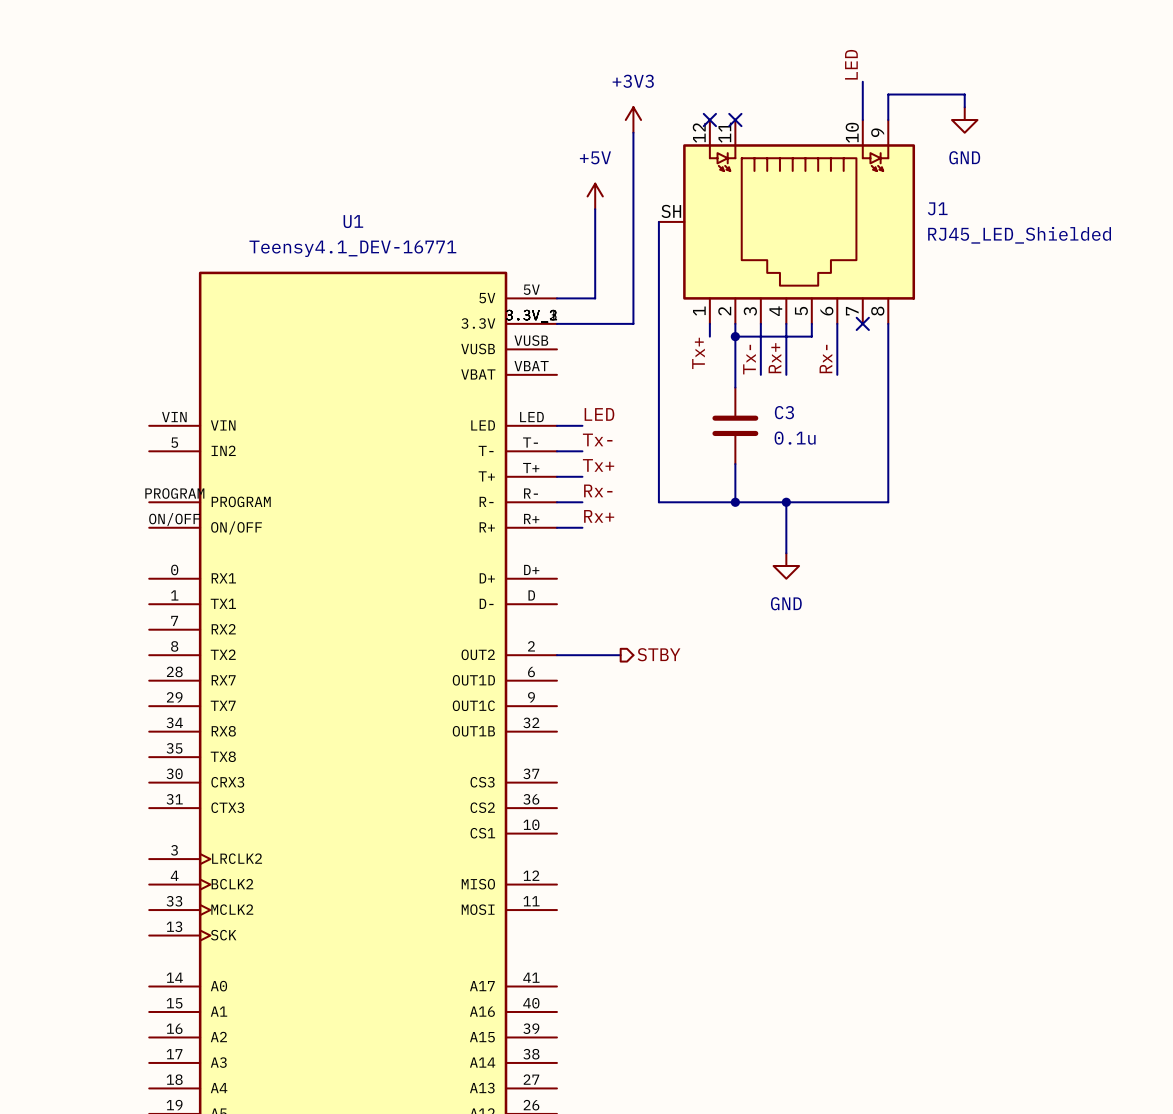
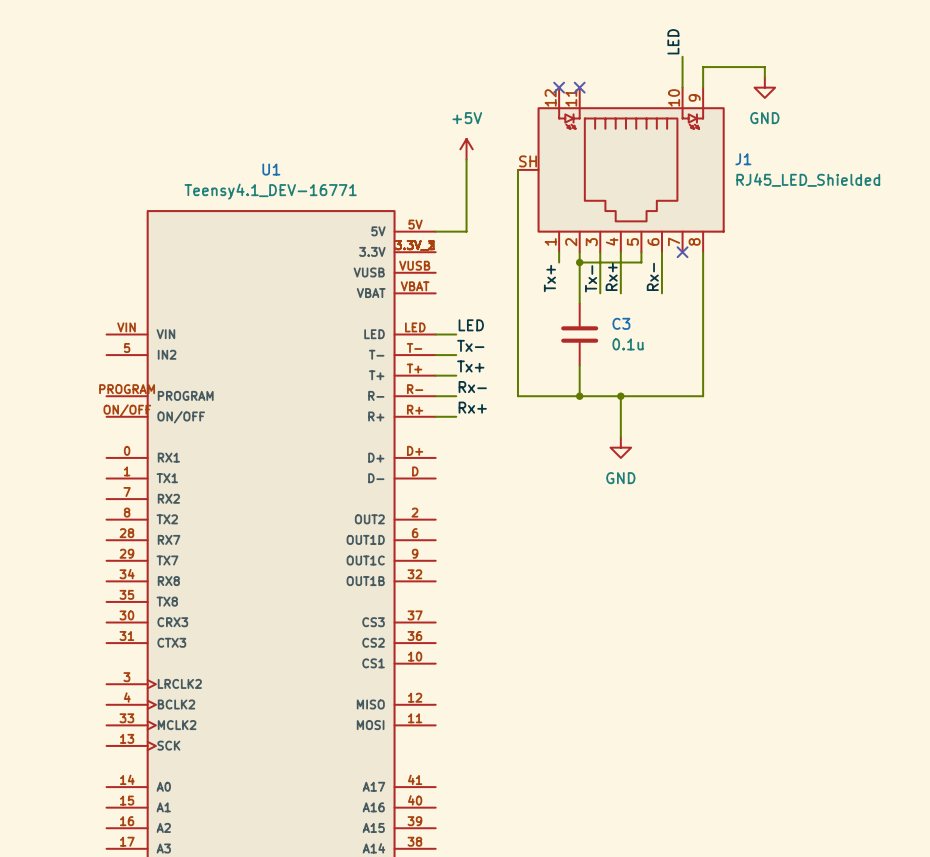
power symbol: +3V3 (633, 120) -> none
wire: (633, 132) (633, 323) (556, 323) -> none
hierarchical label: STBY (659, 654) -> none
wire: (556, 655) (620, 655) -> none

